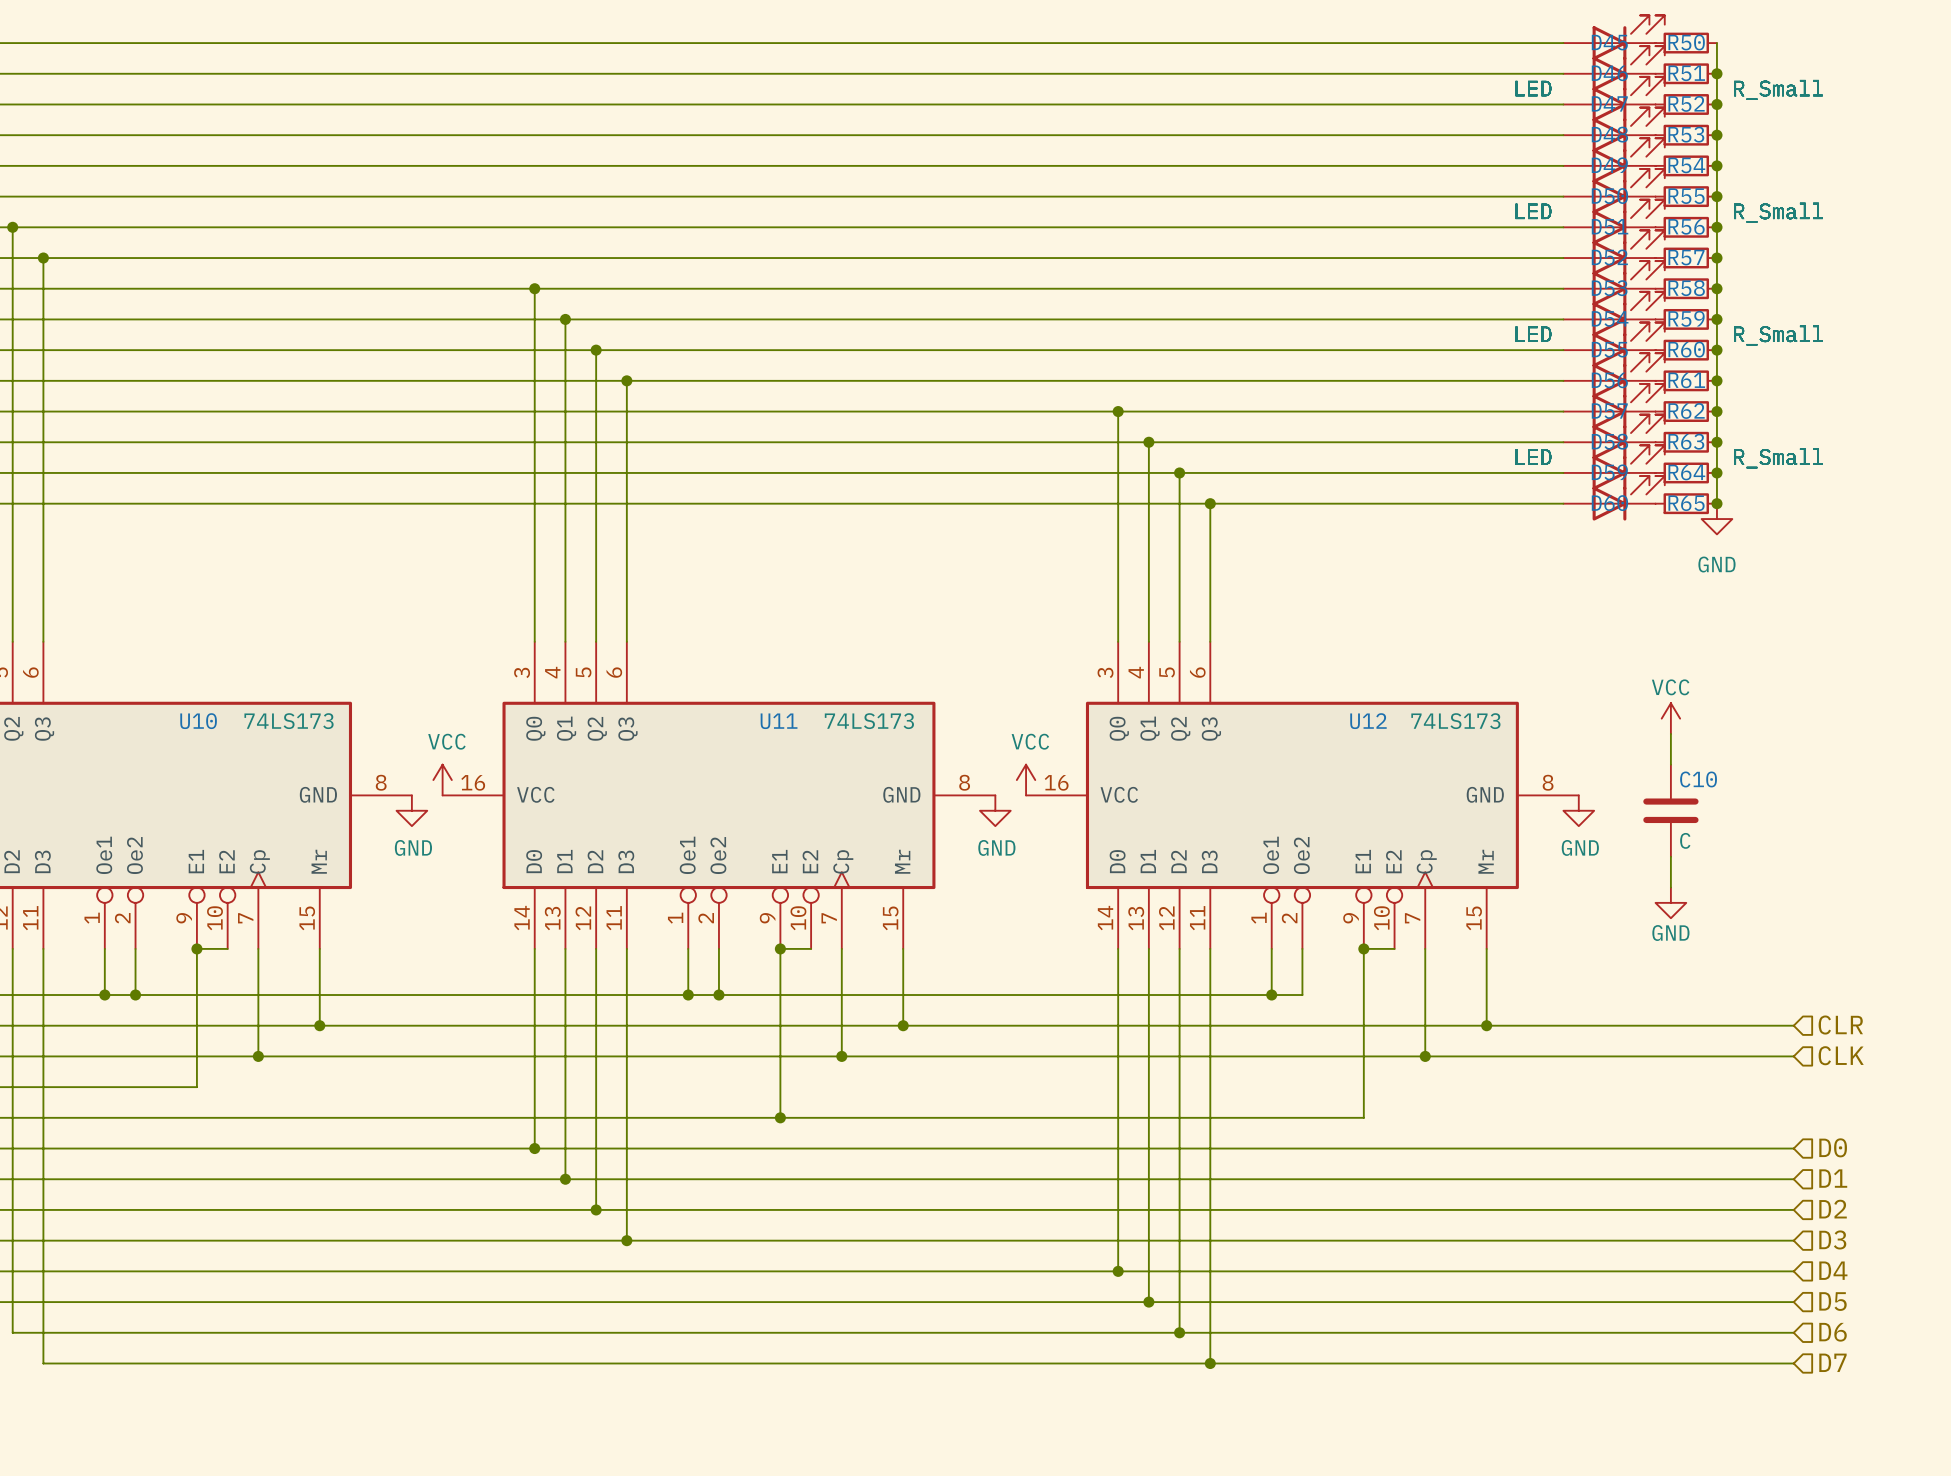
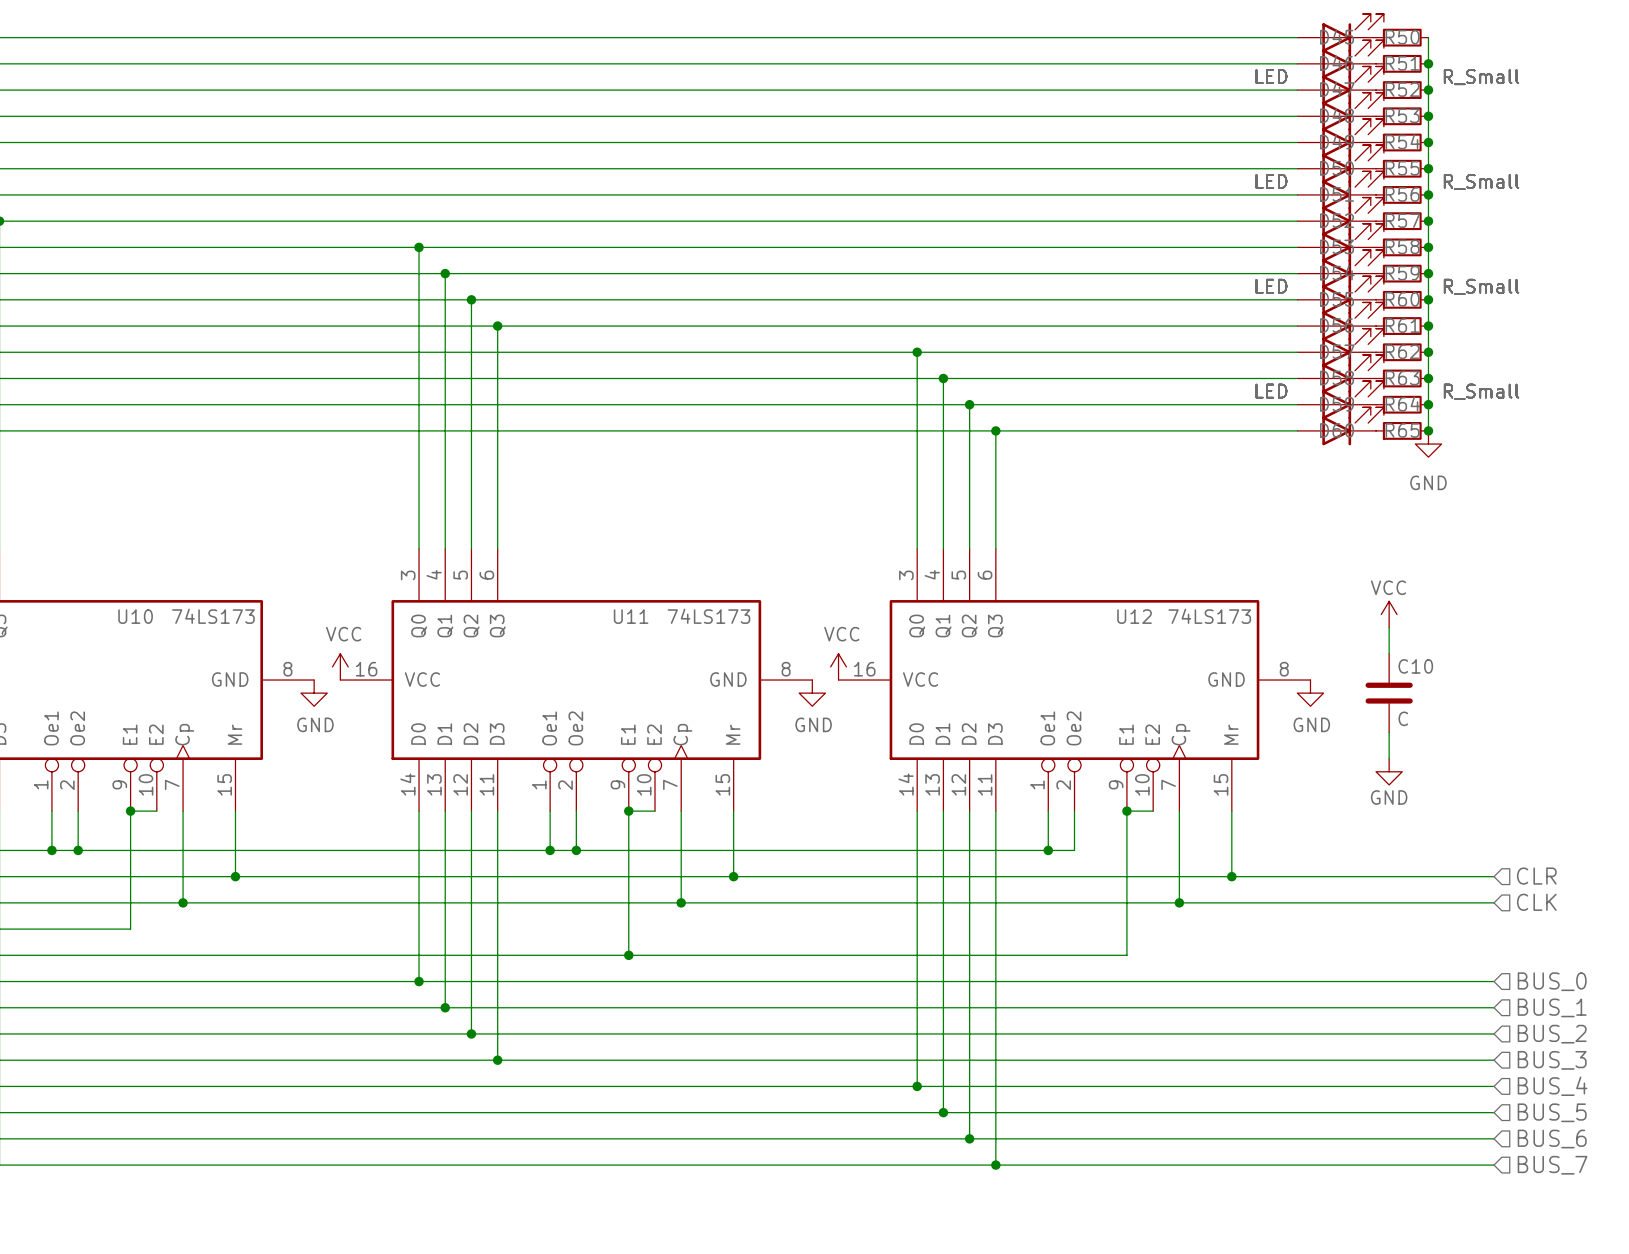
hierarchical label: D0 (1833, 1147) -> BUS_0 (1552, 981)
hierarchical label: D1 (1833, 1178) -> BUS_1 (1552, 1007)
hierarchical label: D2 (1833, 1209) -> BUS_2 (1552, 1034)
hierarchical label: D3 (1832, 1239) -> BUS_3 (1552, 1060)
hierarchical label: D4 (1833, 1270) -> BUS_4 (1552, 1086)
hierarchical label: D5 (1832, 1301) -> BUS_5 (1552, 1112)
hierarchical label: D6 (1833, 1332) -> BUS_6 (1552, 1139)
hierarchical label: D7 (1832, 1362) -> BUS_7 (1552, 1165)

